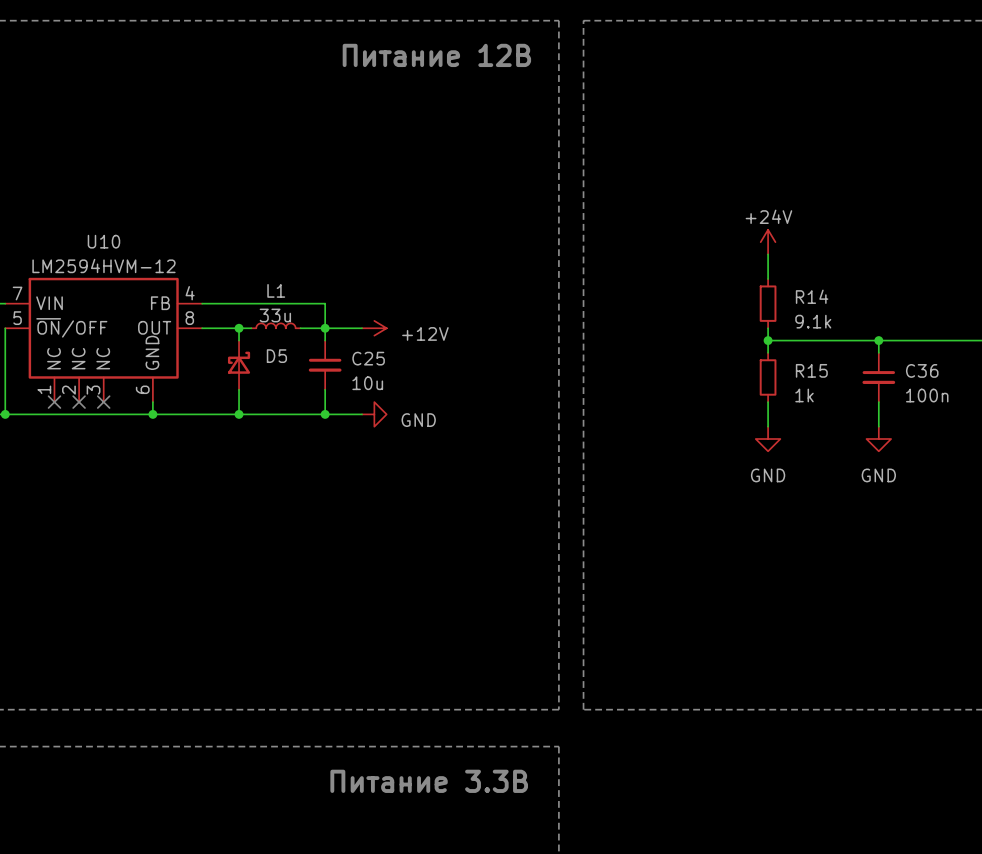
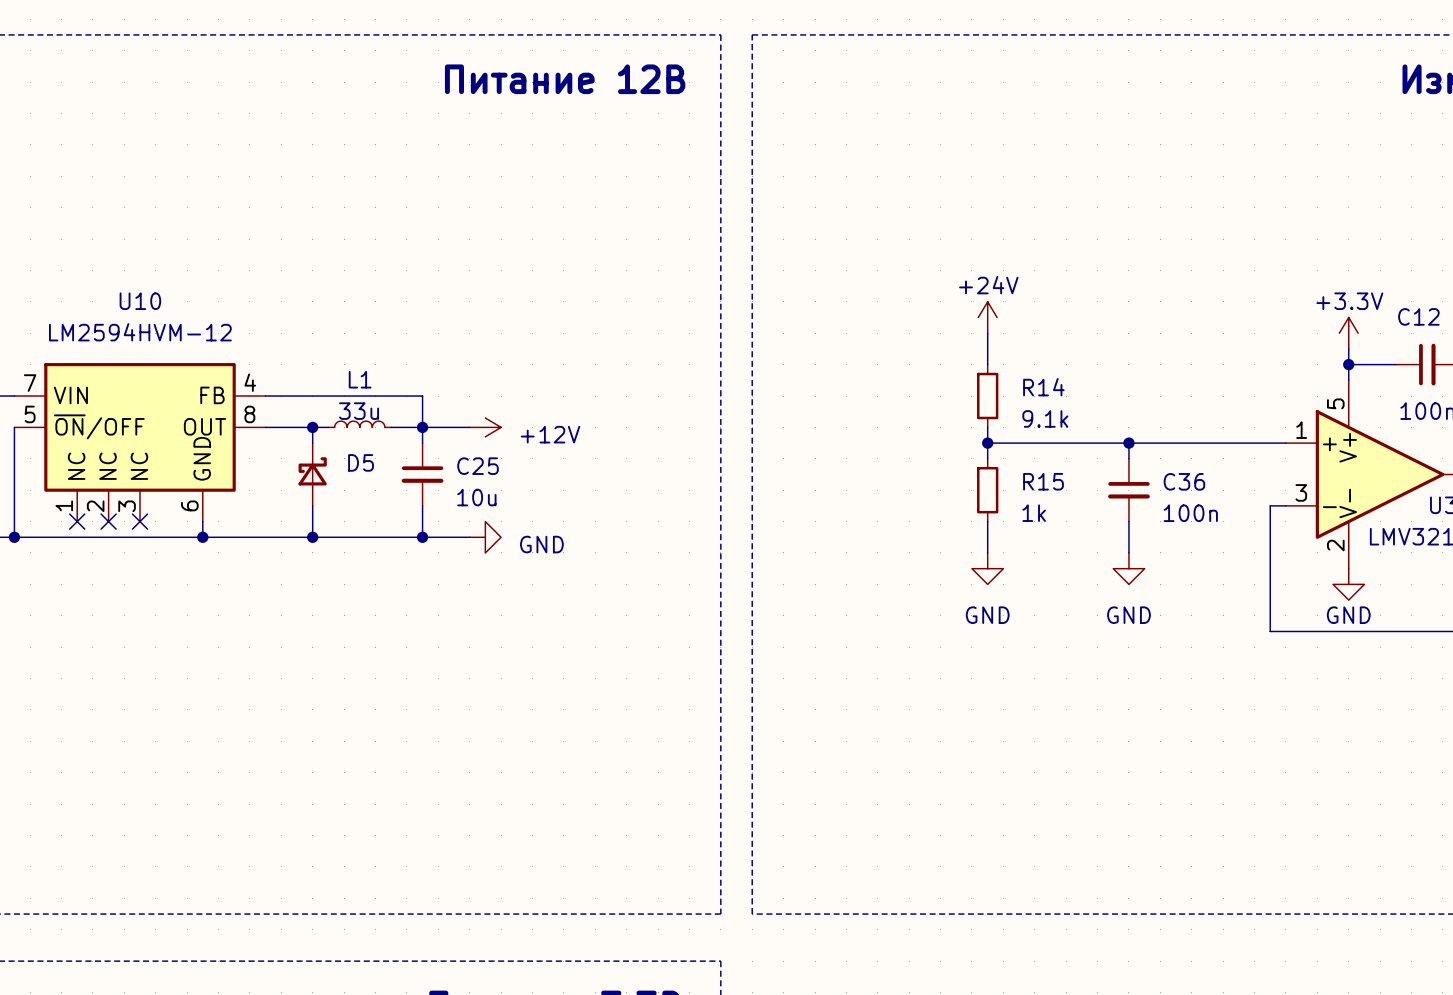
U10 name position: U10 (103, 241) -> U10 (140, 301)
U10 value position: LM2594HVM-12 (103, 266) -> LM2594HVM-12 (140, 332)

